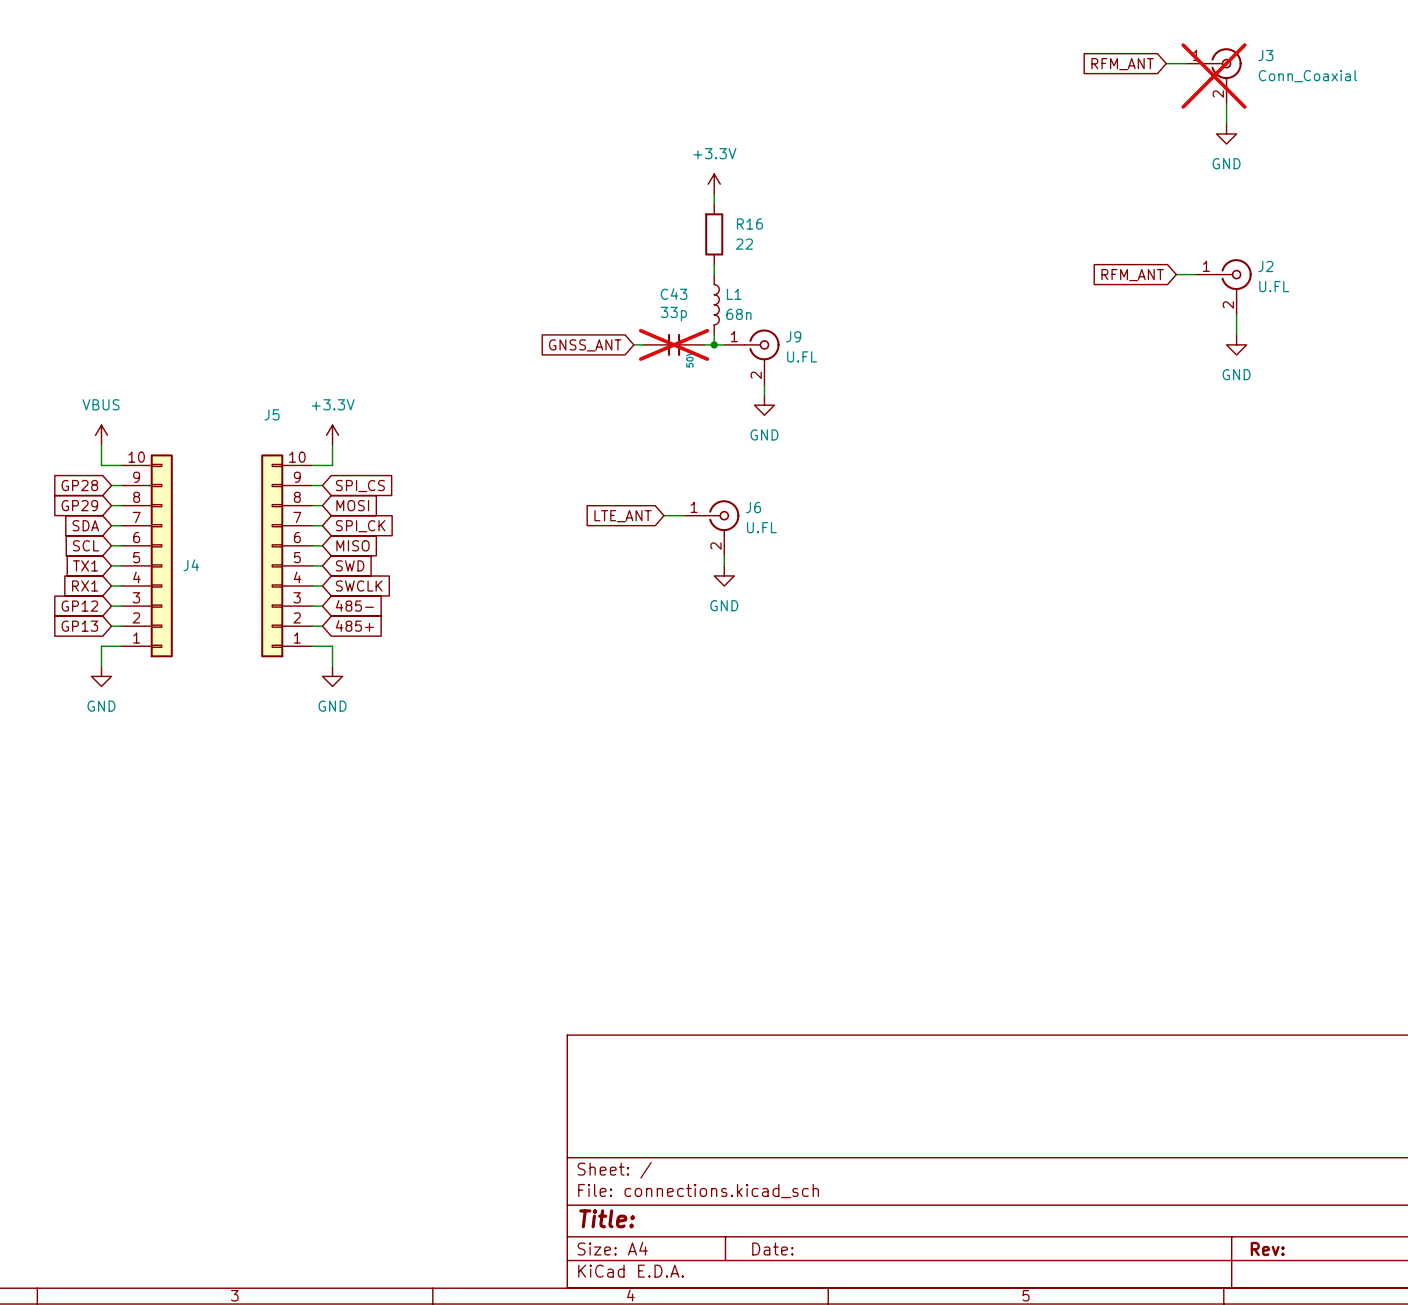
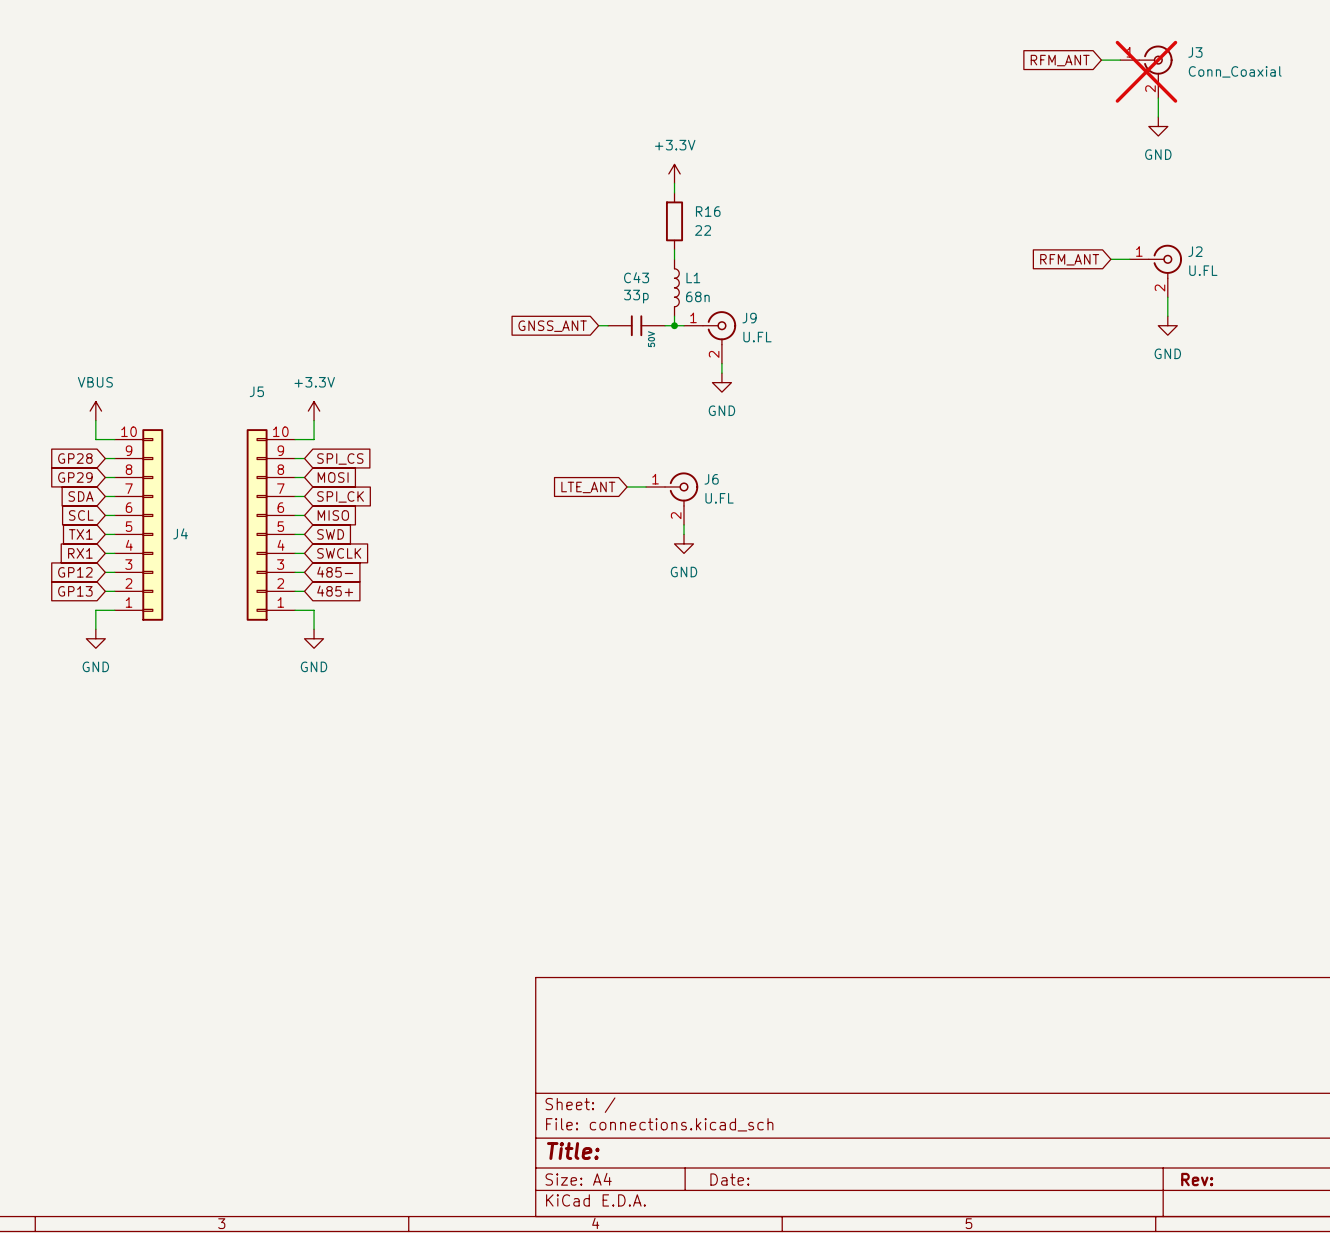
C43 do-not-place cross: (674, 344) -> none

